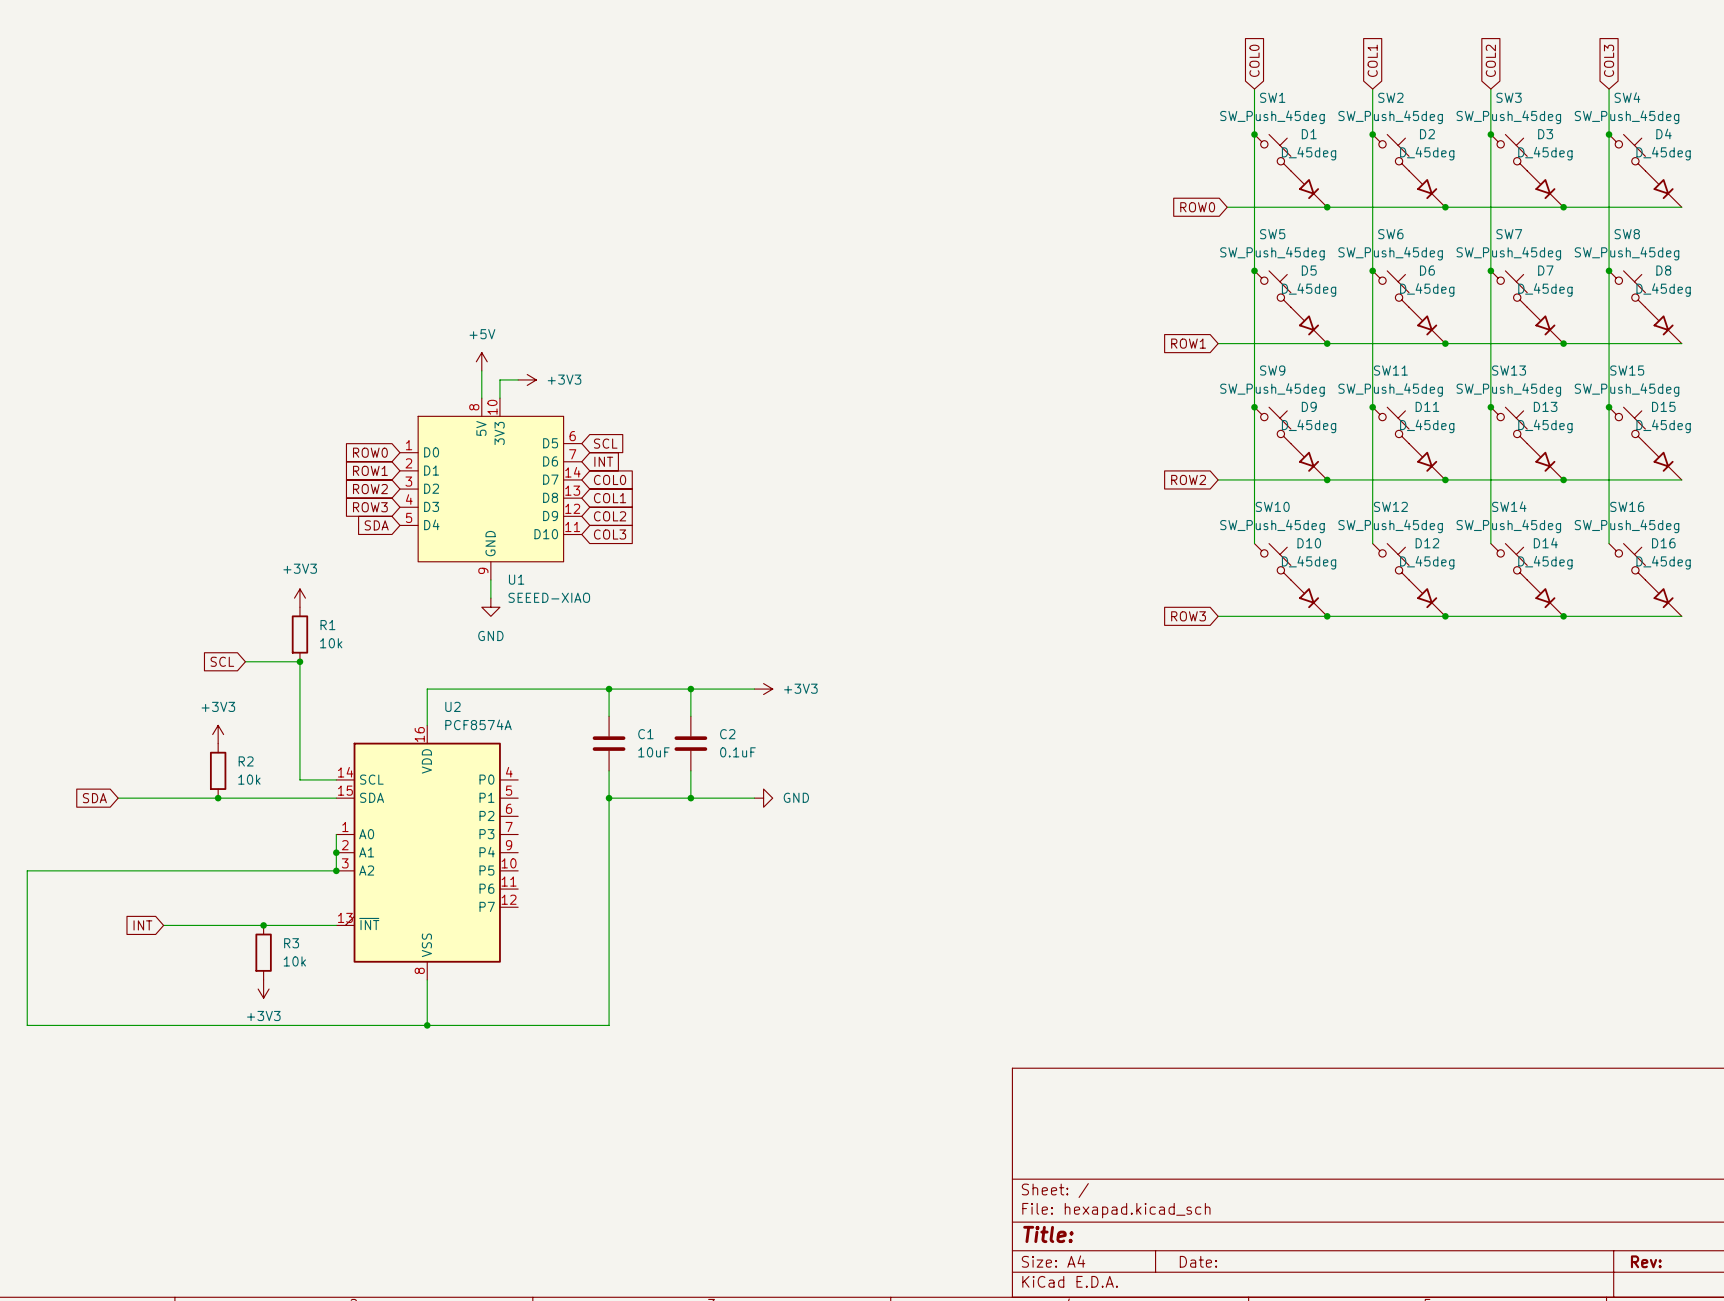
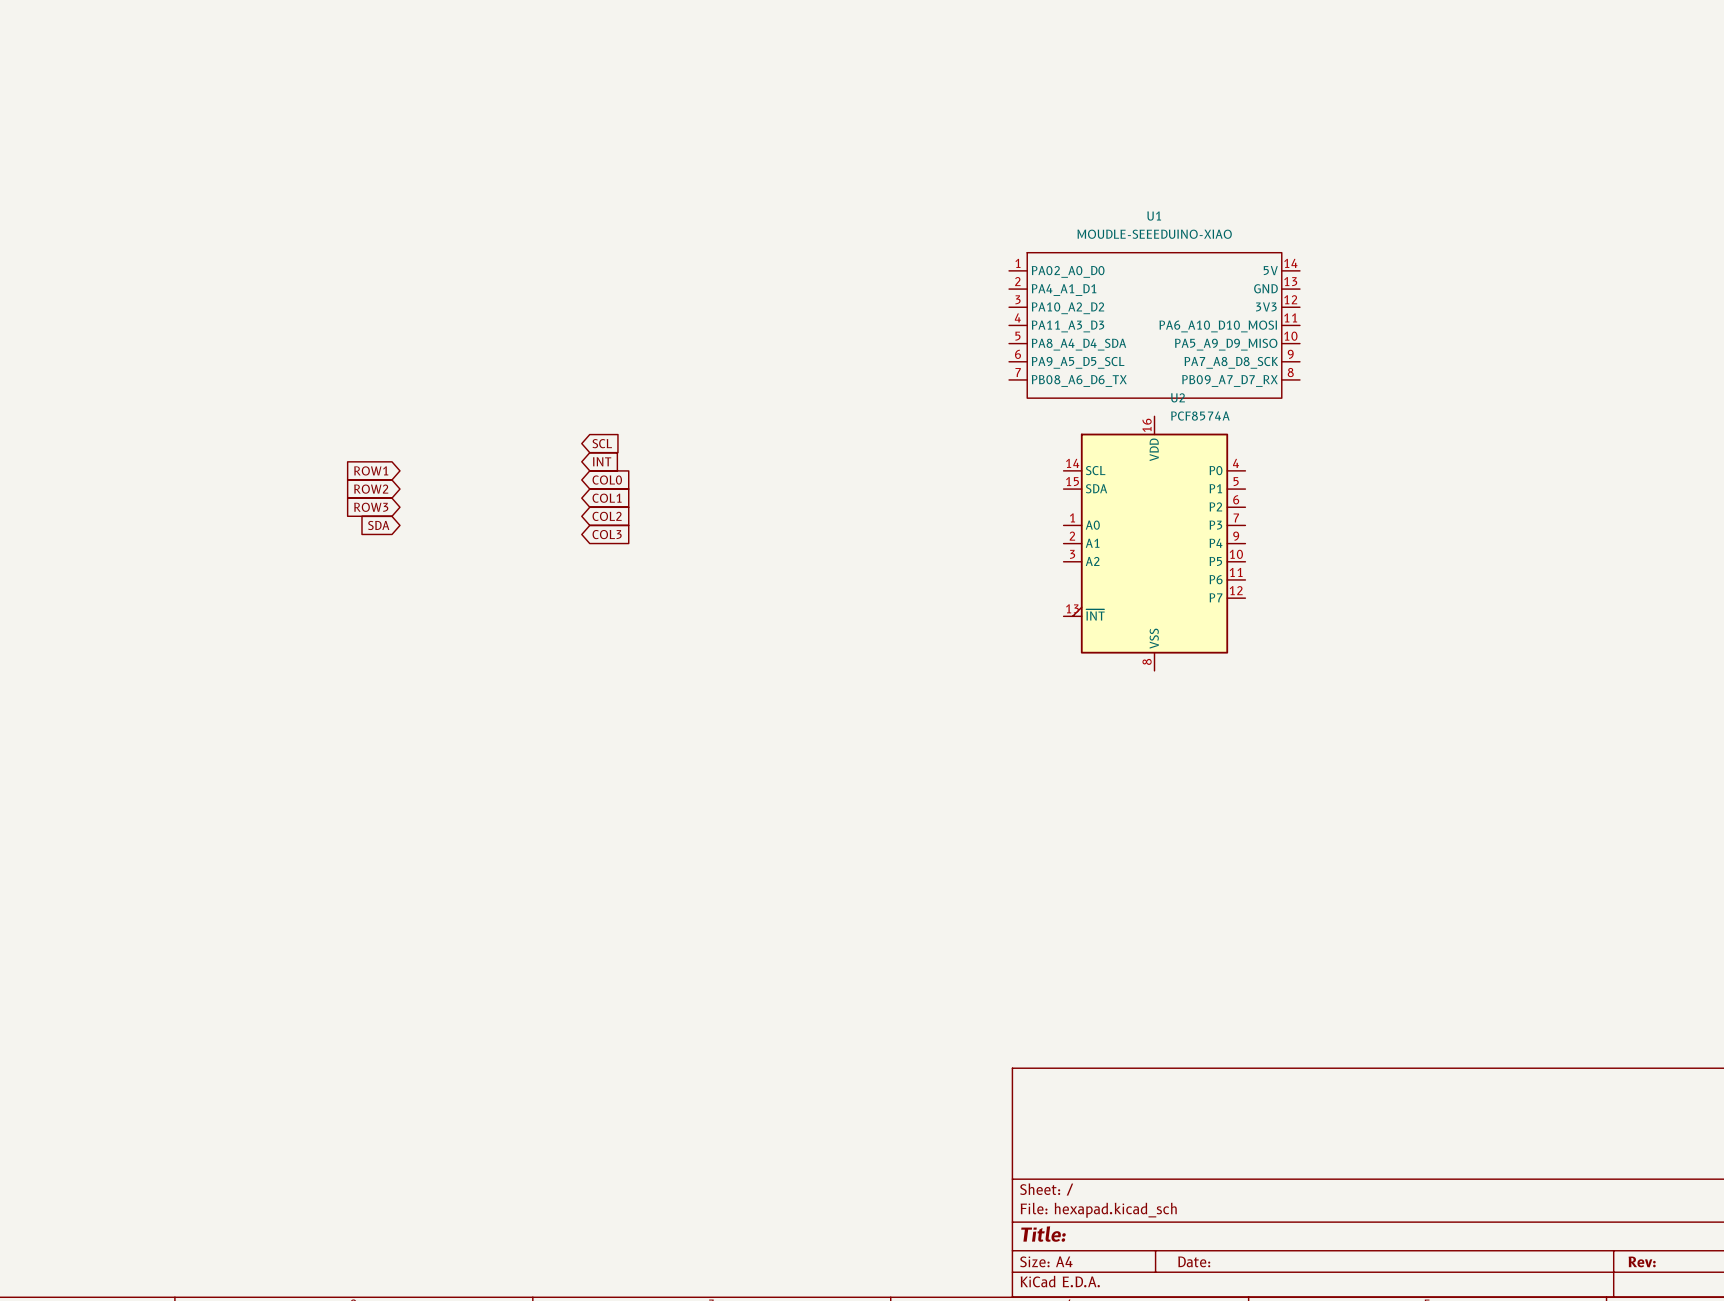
global label: COL0 (1254, 60) -> none
global label: COL1 (1372, 60) -> none
global label: COL2 (1490, 60) -> none
global label: COL3 (1609, 60) -> none
wire: (1254, 89) (1254, 543) -> none
wire: (1372, 89) (1372, 543) -> none
wire: (1490, 89) (1490, 543) -> none
wire: (1609, 89) (1609, 543) -> none
junction: (1254, 134) -> none
junction: (1372, 134) -> none
junction: (1490, 134) -> none
junction: (1609, 134) -> none
SW1: SW_Push_45deg (1272, 152) -> none
SW2: SW_Push_45deg (1390, 152) -> none
SW3: SW_Push_45deg (1509, 152) -> none
SW4: SW_Push_45deg (1627, 152) -> none
D1: D_45deg (1309, 189) -> none
D2: D_45deg (1427, 189) -> none
D3: D_45deg (1545, 189) -> none
D4: D_45deg (1663, 189) -> none
global label: ROW0 (1197, 207) -> none
wire: (1227, 207) (1681, 207) -> none
junction: (1327, 207) -> none
junction: (1445, 207) -> none
junction: (1563, 207) -> none
junction: (1254, 270) -> none
junction: (1372, 270) -> none
junction: (1490, 270) -> none
junction: (1609, 270) -> none
SW5: SW_Push_45deg (1272, 289) -> none
SW6: SW_Push_45deg (1390, 289) -> none
SW7: SW_Push_45deg (1509, 289) -> none
SW8: SW_Push_45deg (1627, 289) -> none
D5: D_45deg (1309, 325) -> none
D6: D_45deg (1427, 325) -> none
D7: D_45deg (1545, 325) -> none
D8: D_45deg (1663, 325) -> none
global label: ROW1 (1188, 343) -> none
wire: (1218, 343) (1681, 343) -> none
junction: (1327, 343) -> none
junction: (1445, 343) -> none
junction: (1563, 343) -> none
power symbol: +5V (481, 361) -> none
wire: (481, 370) (481, 398) -> none
wire: (518, 379) (499, 379) (499, 398) -> none
power symbol: +3V3 (527, 379) -> none
U1 symbol: [399, 398, 582, 580] -> [1009, 252, 1300, 399]
junction: (1254, 407) -> none
junction: (1372, 407) -> none
junction: (1490, 407) -> none
junction: (1609, 407) -> none
SW9: SW_Push_45deg (1272, 425) -> none
SW11: SW_Push_45deg (1390, 425) -> none
SW13: SW_Push_45deg (1509, 425) -> none
SW15: SW_Push_45deg (1627, 425) -> none
global label: ROW0 (370, 452) -> none
D9: D_45deg (1309, 461) -> none
D11: D_45deg (1427, 461) -> none
D13: D_45deg (1545, 461) -> none
D15: D_45deg (1663, 461) -> none
global label: ROW2 (1188, 479) -> none
wire: (1218, 479) (1681, 479) -> none
junction: (1327, 479) -> none
junction: (1445, 479) -> none
junction: (1563, 479) -> none
SW10: SW_Push_45deg (1272, 561) -> none
SW12: SW_Push_45deg (1390, 561) -> none
SW14: SW_Push_45deg (1509, 561) -> none
SW16: SW_Push_45deg (1627, 561) -> none
wire: (490, 579) (490, 598) -> none
U1 name position: U1 (516, 579) -> U1 (1154, 216)
U1 value: SEEED-XIAO (549, 597) -> MOUDLE-SEEEDUINO-XIAO (1154, 234)
power symbol: +3V3 (299, 598) -> none
D10: D_45deg (1309, 598) -> none
D12: D_45deg (1427, 598) -> none
D14: D_45deg (1545, 598) -> none
D16: D_45deg (1663, 598) -> none
power symbol: GND (490, 607) -> none
global label: ROW3 (1188, 616) -> none
wire: (1218, 616) (1681, 616) -> none
junction: (1327, 616) -> none
junction: (1445, 616) -> none
junction: (1563, 616) -> none
R1: 10k (299, 634) -> none
global label: SCL (222, 661) -> none
wire: (245, 661) (299, 661) (299, 779) (336, 779) -> none
junction: (299, 661) -> none
wire: (609, 689) (609, 716) -> none
junction: (609, 689) -> none
wire: (690, 689) (690, 716) -> none
junction: (690, 689) -> none
wire: (754, 689) (427, 689) (427, 725) -> none
power symbol: +3V3 (763, 689) -> none
power symbol: +3V3 (218, 734) -> none
C1: 10uF (609, 743) -> none
C2: 0.1uF (690, 743) -> none
R2: 10k (218, 770) -> none
wire: (609, 770) (609, 1025) (27, 1025) (27, 870) (336, 870) (336, 834) -> none
wire: (690, 770) (690, 798) -> none
global label: SDA (94, 798) -> none
wire: (118, 798) (336, 798) -> none
junction: (218, 798) -> none
wire: (609, 798) (754, 798) -> none
junction: (609, 798) -> none
junction: (690, 798) -> none
power symbol: GND (763, 798) -> none
junction: (336, 852) -> none
U2 position: (427, 852) -> (1154, 543)
junction: (336, 870) -> none
global label: INT (142, 925) -> none
wire: (163, 925) (336, 925) -> none
junction: (263, 925) -> none
R3: 10k (263, 952) -> none
wire: (427, 979) (427, 1025) -> none
power symbol: +3V3 (263, 989) -> none
junction: (427, 1025) -> none

